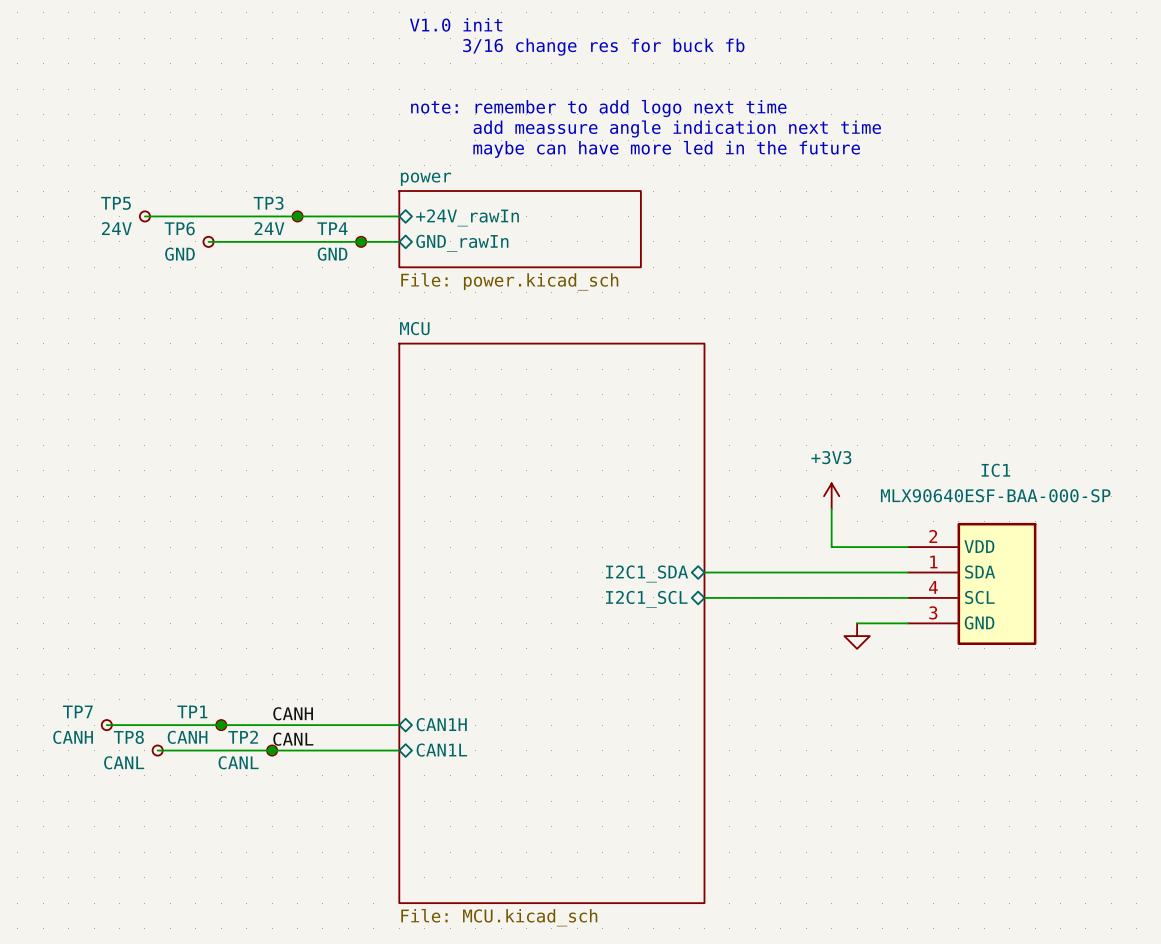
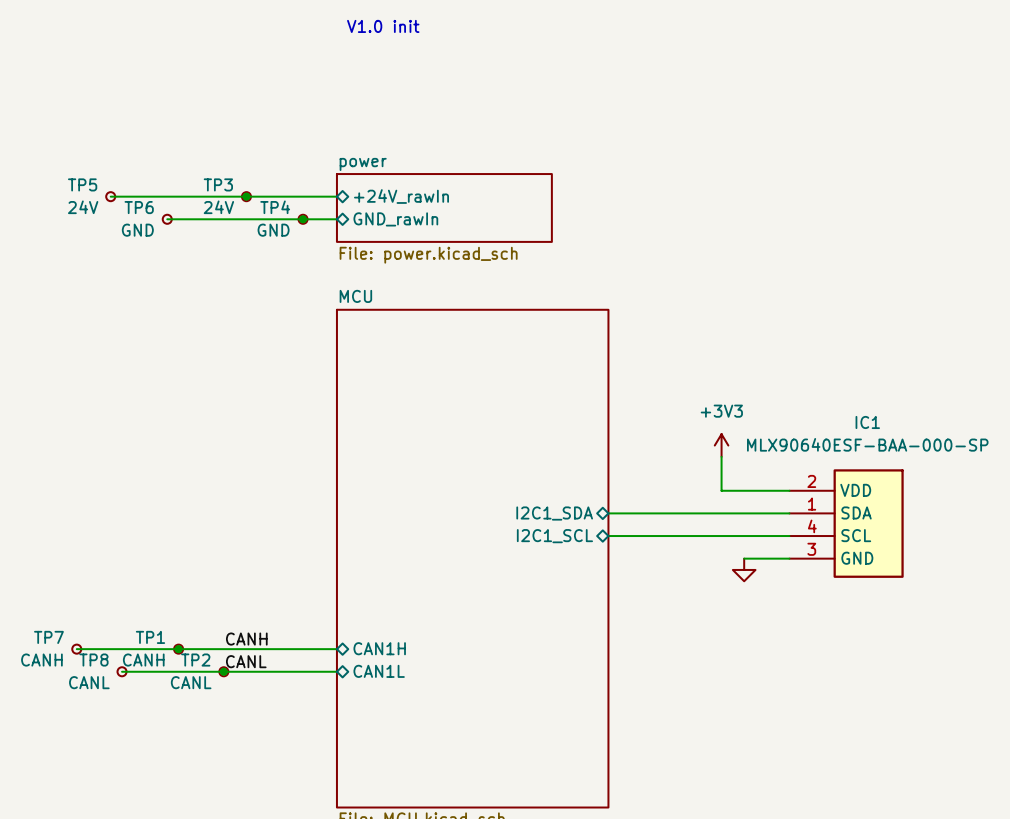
text: 3/16 change res for buck fb (603, 47) -> none
text: note: remember to add logo next time (598, 108) -> none
text: add meassure angle indication next time (677, 129) -> none
text: maybe can have more led in the future (666, 149) -> none

